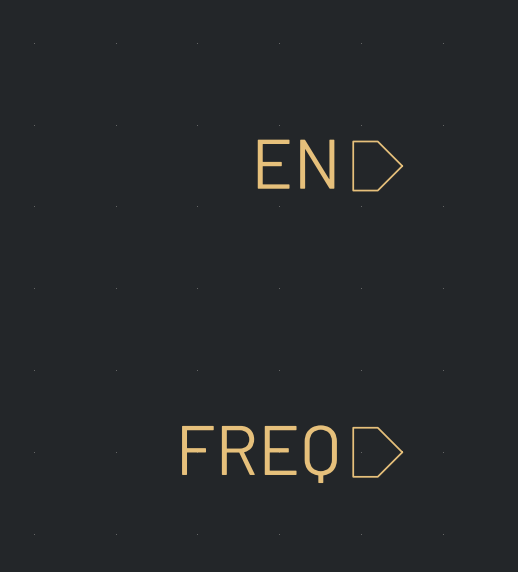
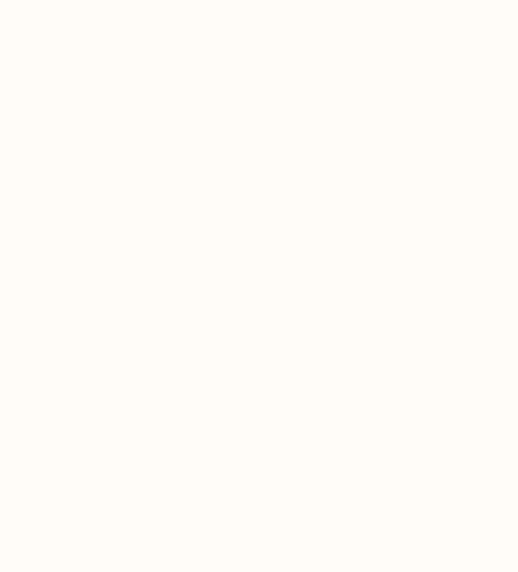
hierarchical label: EN (296, 164) -> none
hierarchical label: FREQ (259, 454) -> none

